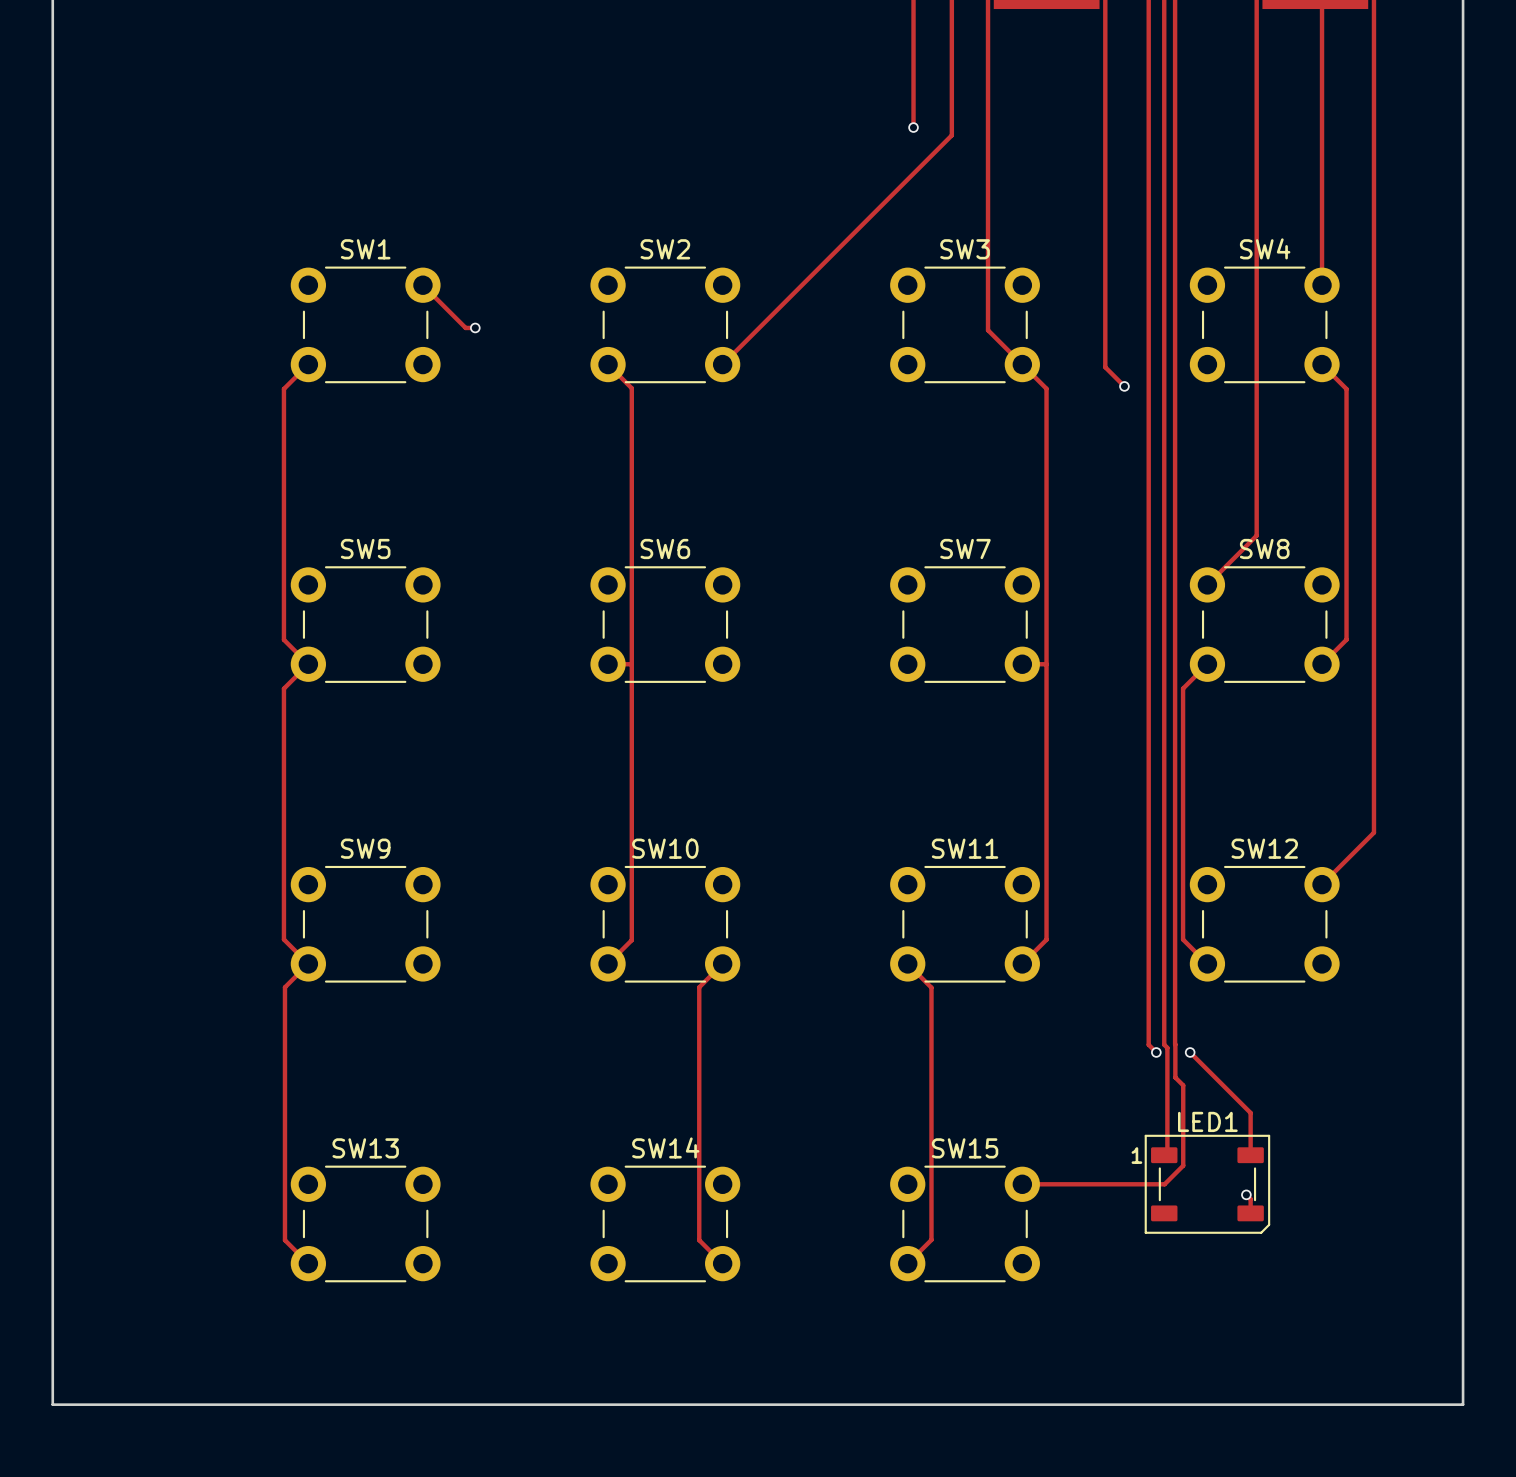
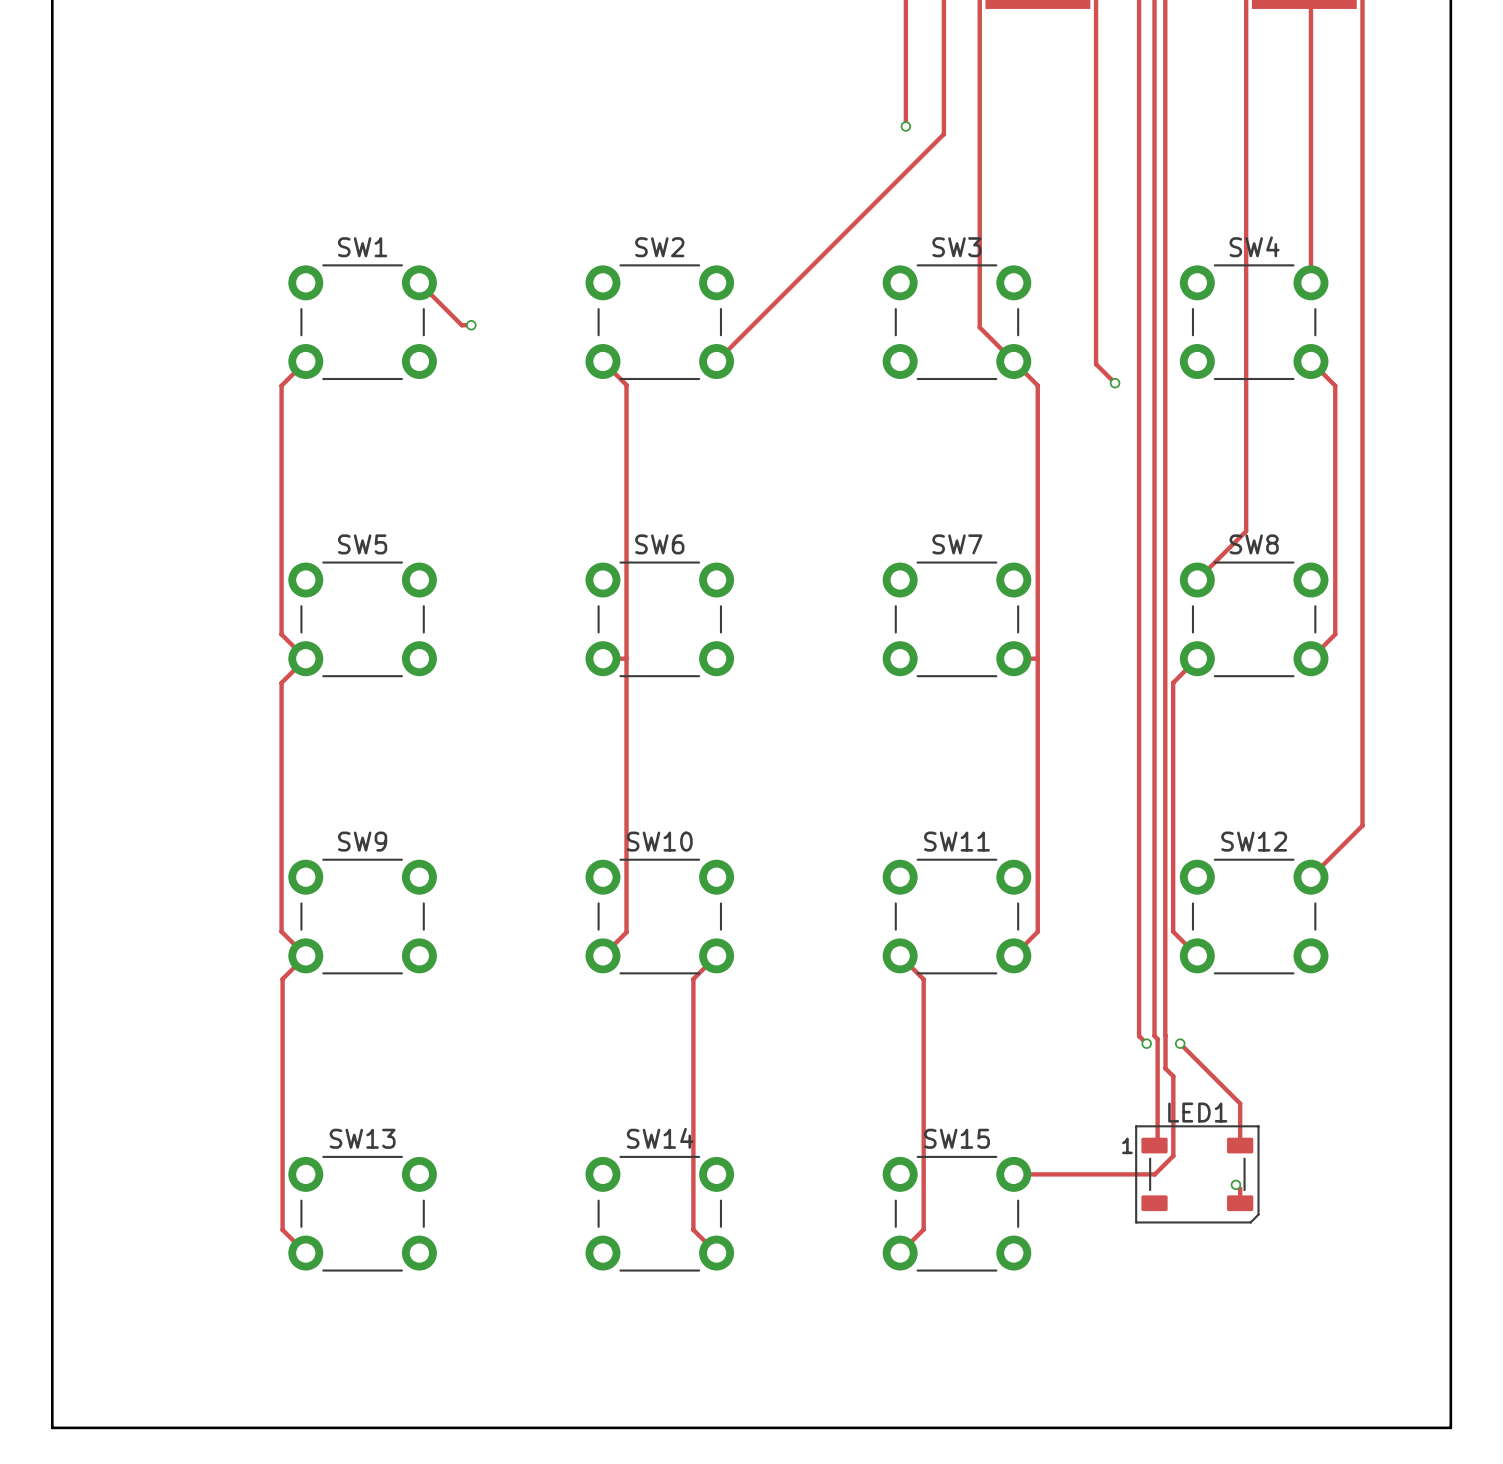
board edge: (52, 1404) (1463, 1404) -> (52, 1392) (52, 1427) (1450, 1427) (1450, 1392)

